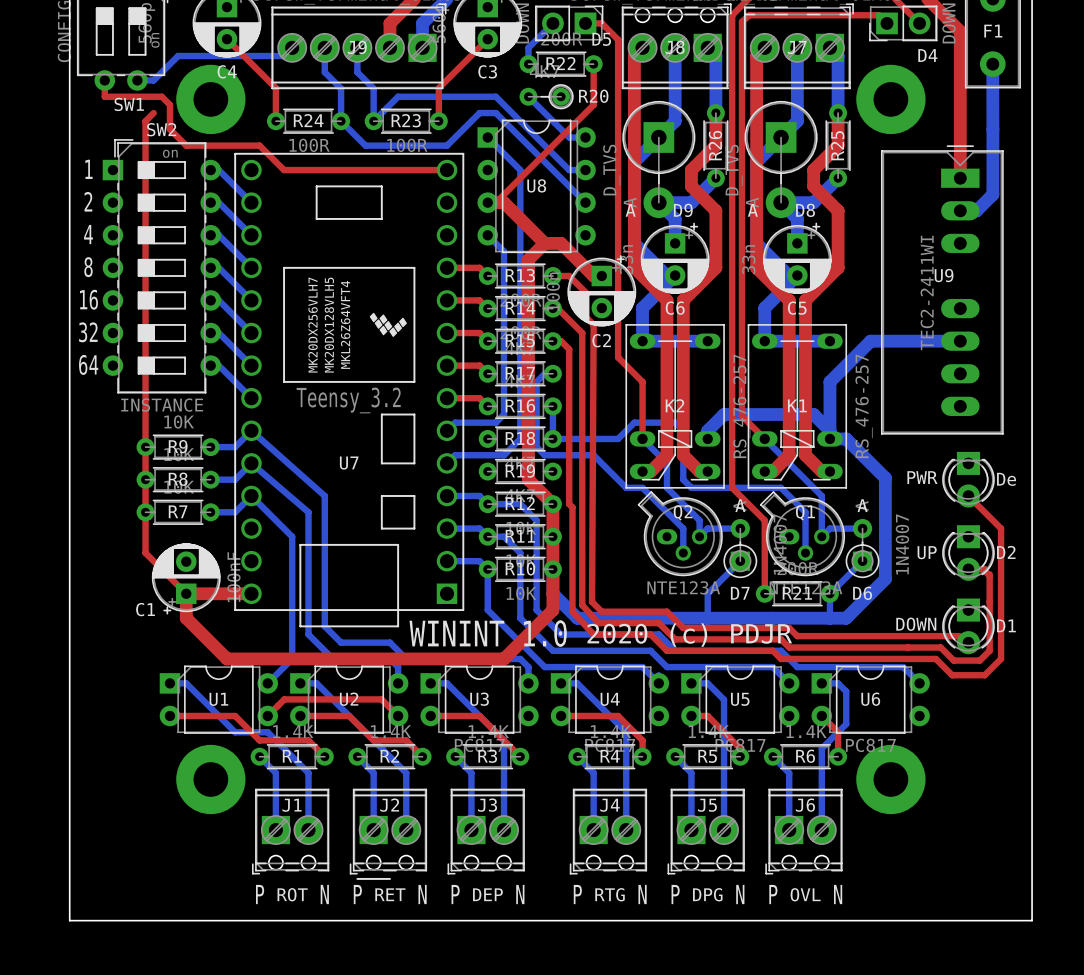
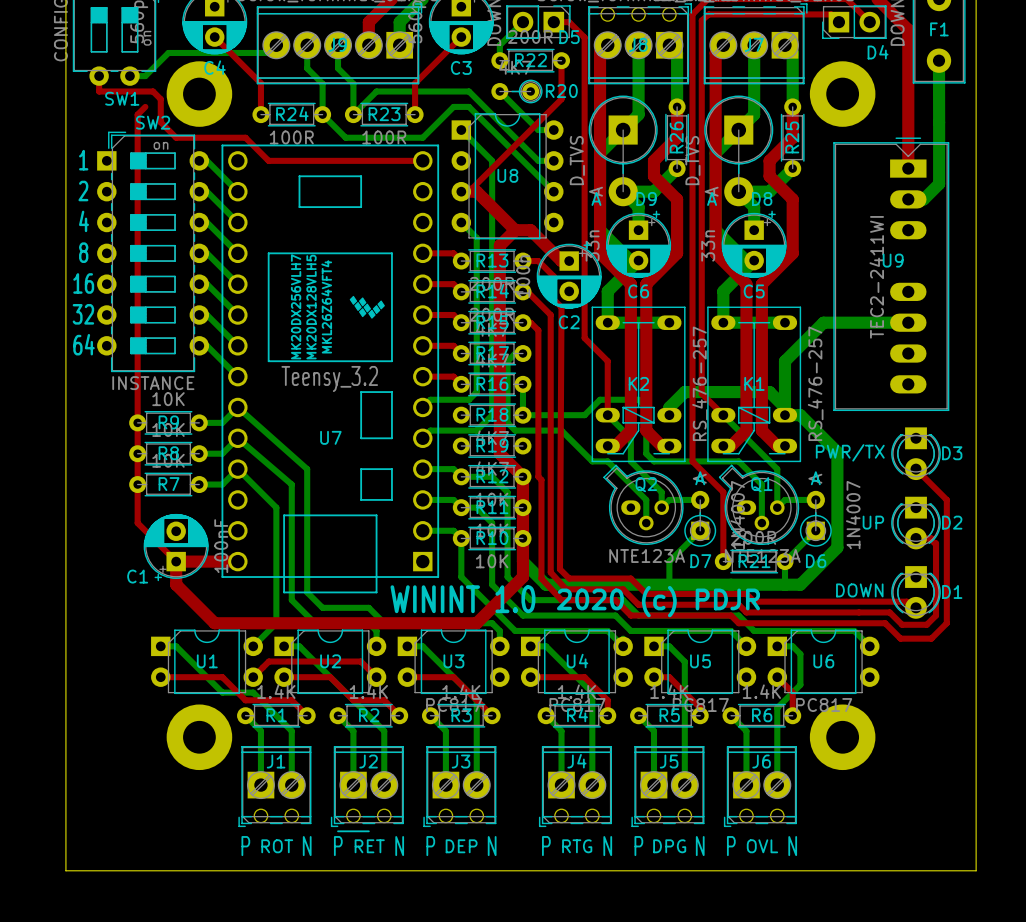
De value: PWR (922, 477) -> PWR/TX (850, 452)
De name: De (1006, 479) -> D3 (952, 453)

